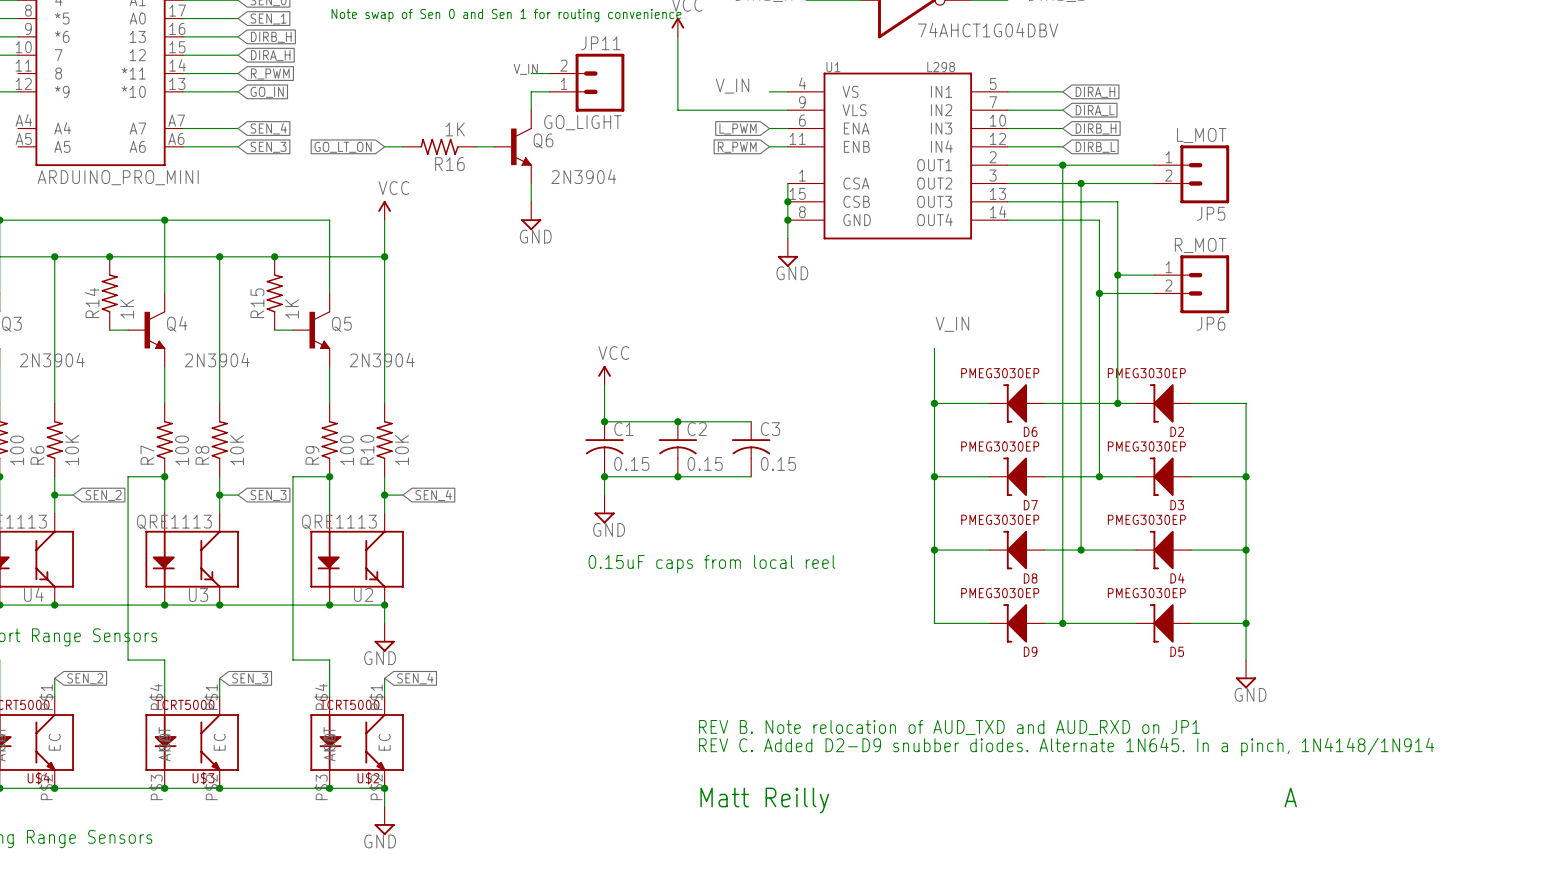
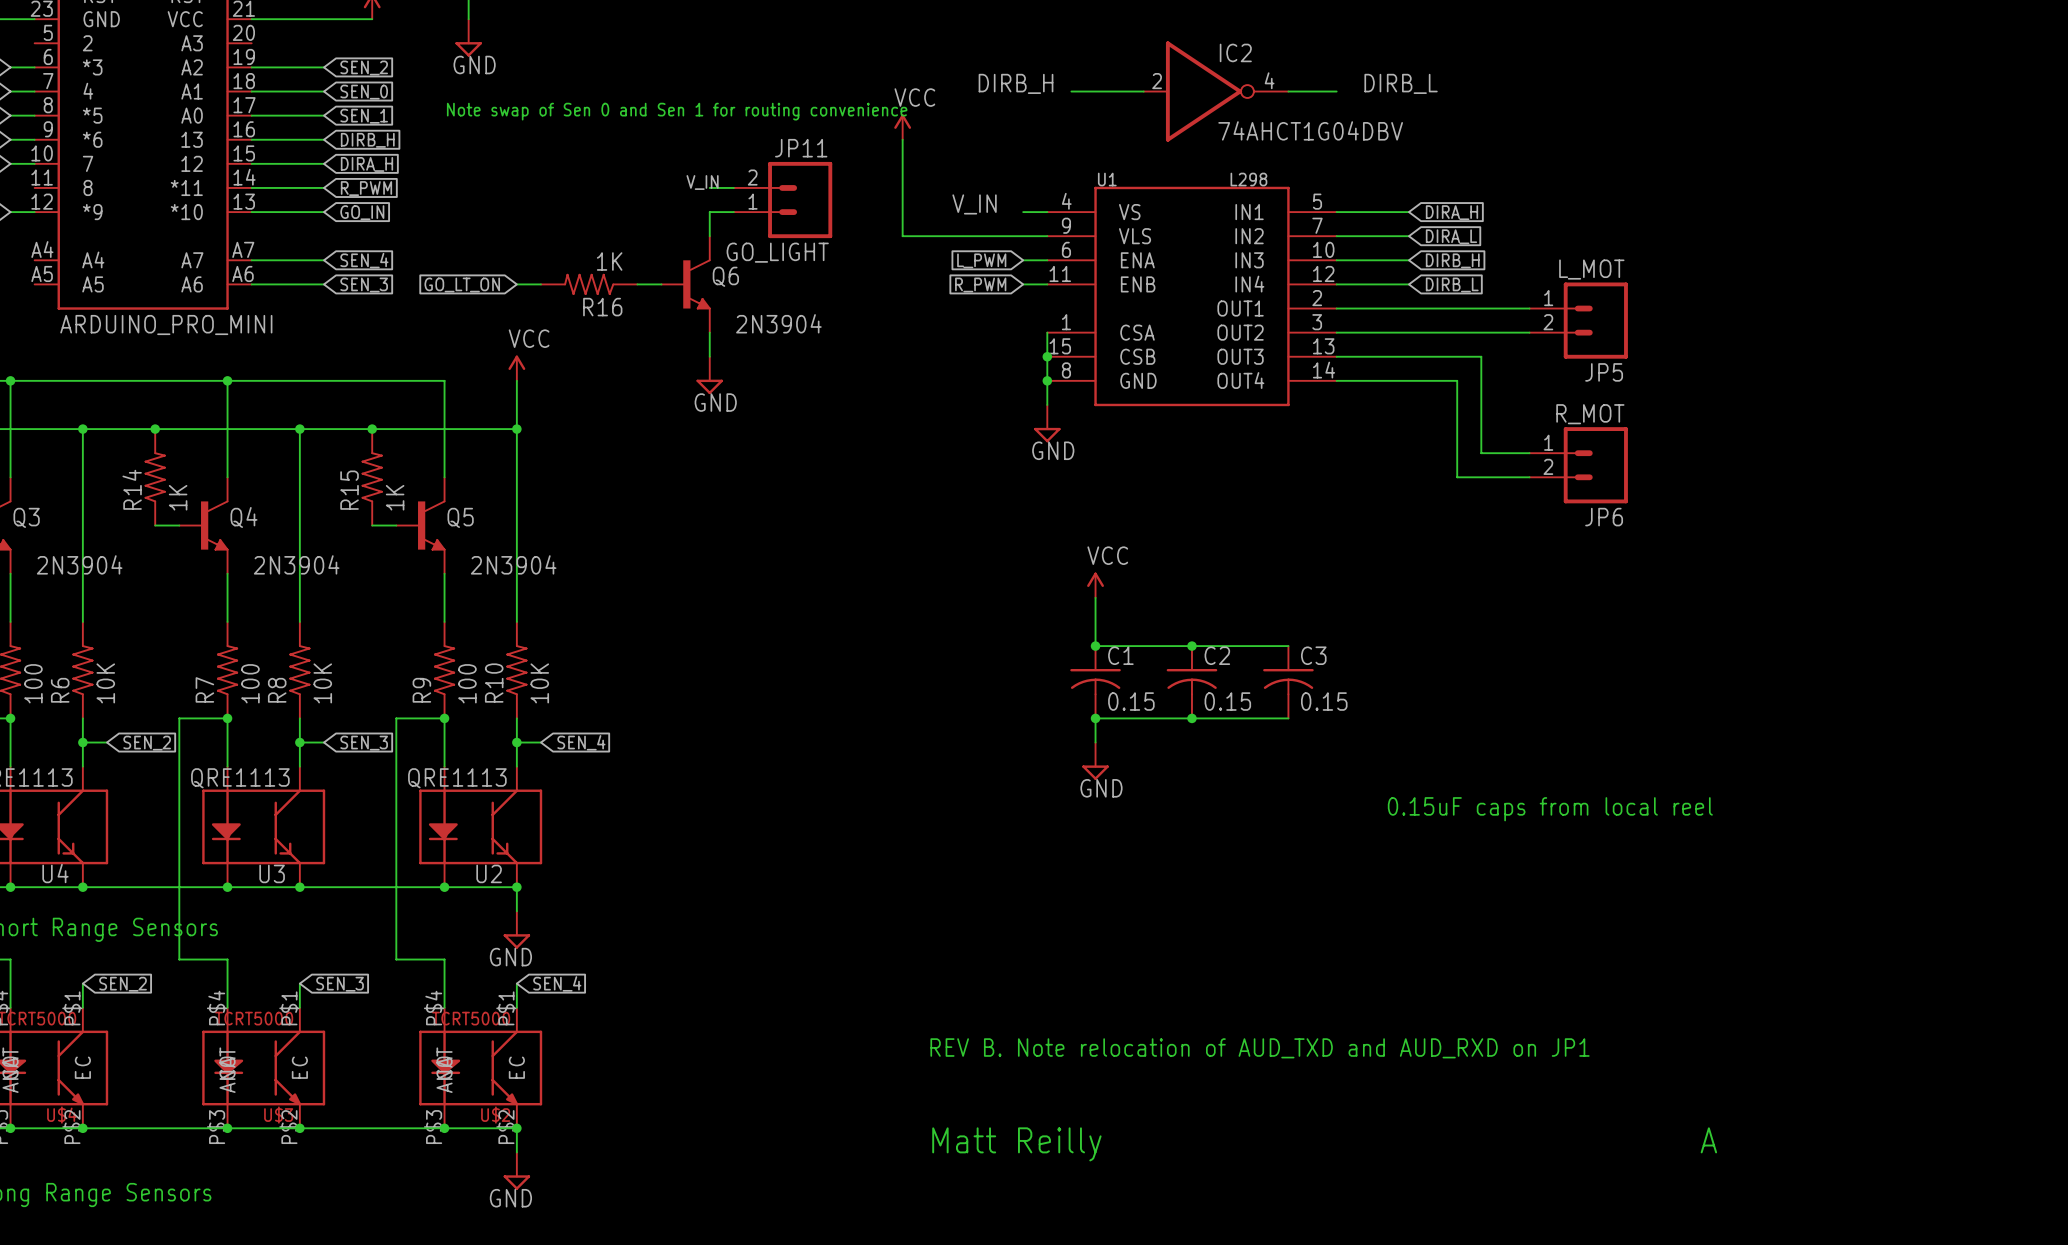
wire: (1062, 165) (1062, 623) -> none
junction: (1062, 165) -> none
wire: (1081, 183) (1081, 550) -> none
junction: (1081, 183) -> none
wire: (1117, 275) (1117, 403) -> none
junction: (1117, 275) -> none
wire: (1099, 293) (1099, 476) -> none
junction: (1099, 293) -> none
label: V_IN (952, 324) -> none
wire: (934, 348) (934, 623) (989, 623) -> none
power symbol: VCC (604, 375) -> none
power symbol: none -> VCC (1095, 585)
wire: (604, 385) (604, 421) (751, 421) -> none
wire: none -> (1095, 597) (1095, 646) (1288, 646)
wire: (934, 403) (989, 403) -> none
junction: (934, 403) -> none
D6: PMEG3030EP (1016, 403) -> none
wire: (1044, 403) (1136, 403) -> none
junction: (1117, 403) -> none
D2: PMEG3030EP (1163, 403) -> none
wire: (1191, 403) (1246, 403) (1246, 660) -> none
junction: (604, 421) -> none
junction: (677, 421) -> none
junction: none -> (1095, 646)
junction: none -> (1191, 646)
C1 position: (604, 449) -> (1095, 682)
C2 position: (677, 449) -> (1191, 682)
C3 position: (751, 449) -> (1288, 682)
junction: (604, 476) -> none
junction: (677, 476) -> none
wire: (751, 476) (604, 476) (604, 495) -> none
junction: none -> (1095, 718)
junction: none -> (1191, 718)
wire: none -> (1240, 718) (1095, 718) (1095, 742)
junction: (934, 476) -> none
wire: (971, 476) (989, 476) -> none
D7: PMEG3030EP (1016, 476) -> none
wire: (1044, 476) (1136, 476) -> none
junction: (1099, 476) -> none
D3: PMEG3030EP (1163, 476) -> none
wire: (1191, 476) (1246, 476) -> none
junction: (1246, 476) -> none
power symbol: GND (604, 509) -> none
power symbol: none -> GND (1095, 761)
text: none -> 0.15uF caps from local reel (1550, 809)
wire: (934, 550) (989, 550) -> none
junction: (934, 550) -> none
D8: PMEG3030EP (1016, 550) -> none
wire: (1044, 550) (1136, 550) -> none
junction: (1081, 550) -> none
D4: PMEG3030EP (1163, 550) -> none
wire: (1191, 550) (1246, 550) -> none
junction: (1246, 550) -> none
text: 0.15uF caps from local reel (712, 564) -> none
D9: PMEG3030EP (1016, 623) -> none
wire: (1044, 623) (1136, 623) -> none
junction: (1062, 623) -> none
D5: PMEG3030EP (1163, 623) -> none
wire: (1191, 623) (1246, 623) -> none
junction: (1246, 623) -> none
power symbol: GND (1246, 674) -> none
text: REV C. Added D2-D9 snubber diodes. Alternate 1N645. In a pinch, 1N4148/1N914 (1066, 747) -> none

